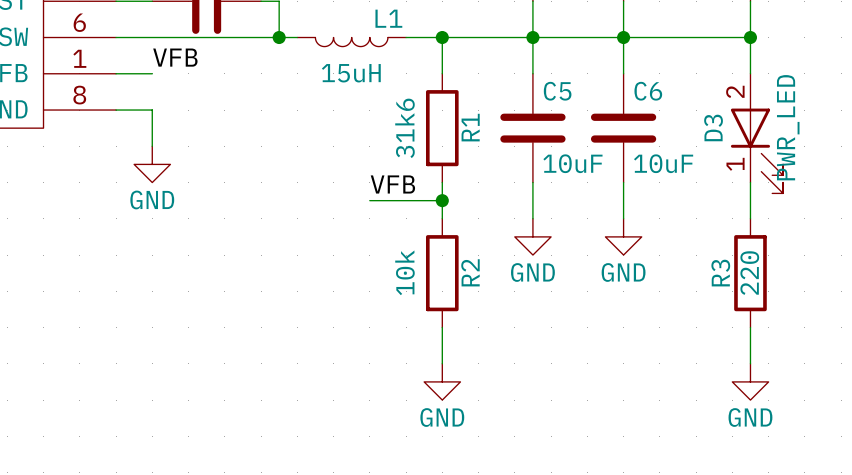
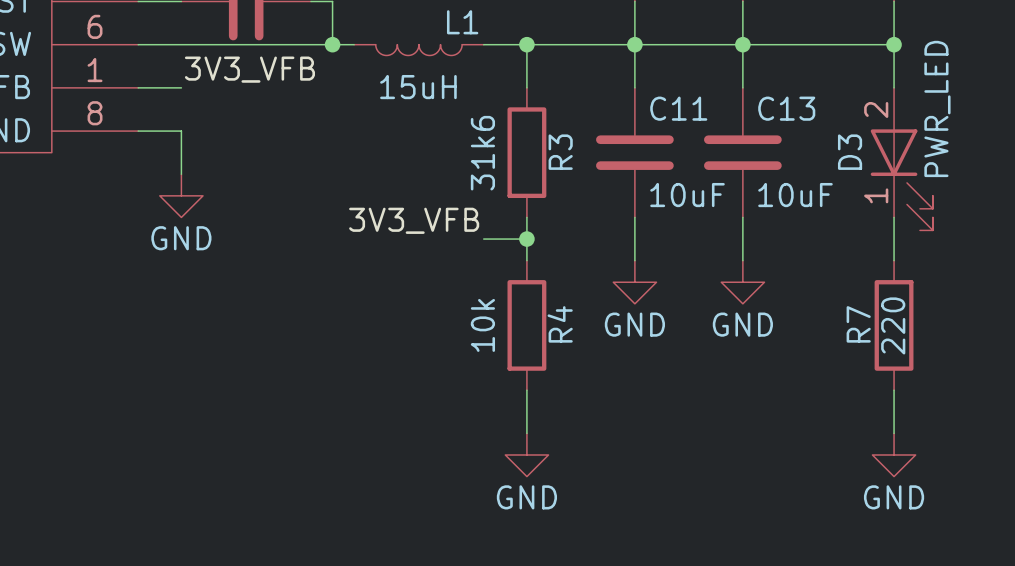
label: VFB (175, 57) -> 3V3_VFB (249, 69)
C5 name: C5 (557, 91) -> C11 (678, 108)
C6 name: C6 (648, 91) -> C13 (786, 108)
R1 name: R1 (470, 127) -> R3 (560, 152)
D3 value position: PWR_LED (788, 127) -> PWR_LED (937, 108)
label: VFB (392, 184) -> none
label: none -> 3V3_VFB (414, 220)
wire: (369, 200) (406, 200) -> none
R2 name: R2 (470, 272) -> R4 (560, 324)
R3 name: R3 (720, 273) -> R7 (858, 324)

